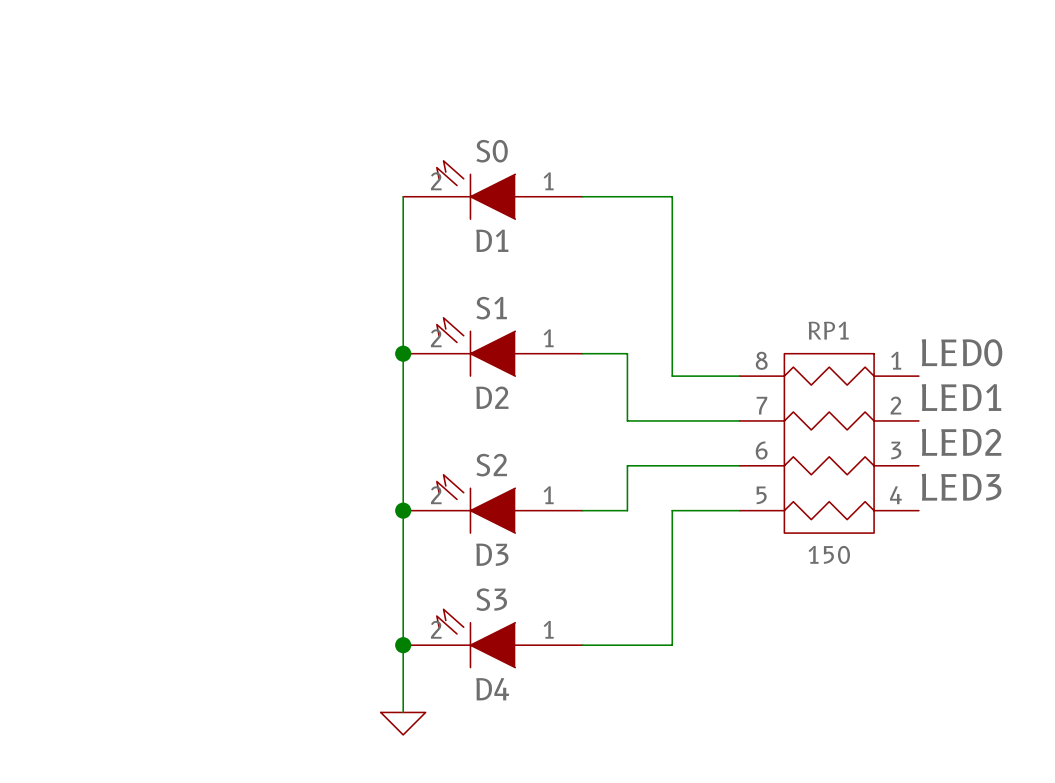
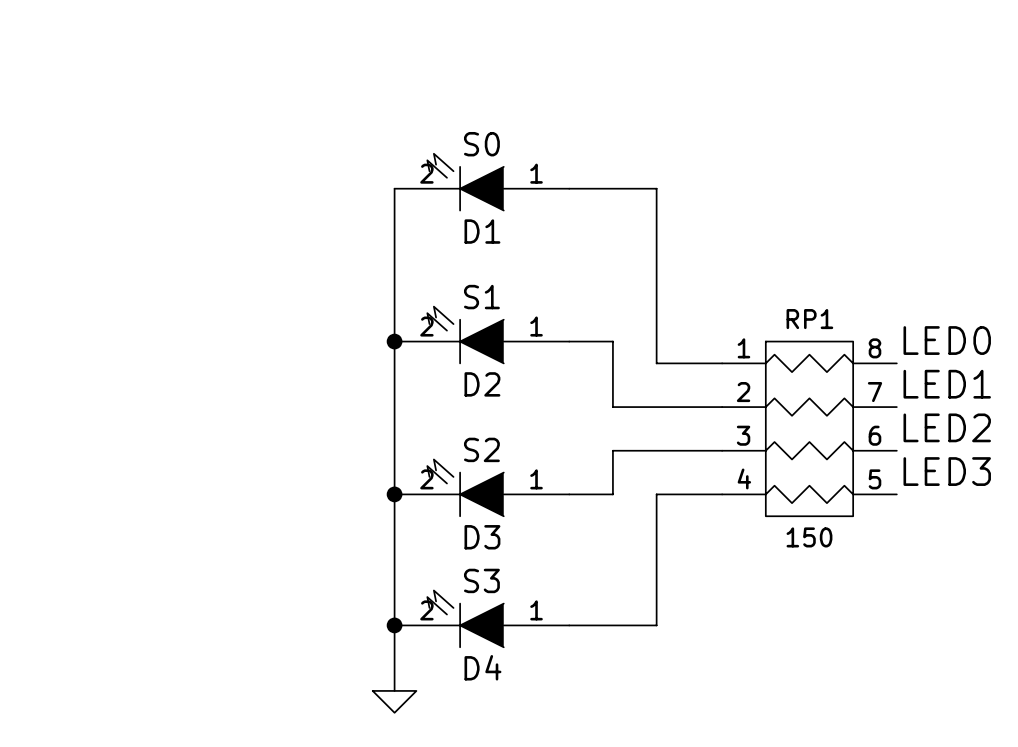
RP1 flip: as is (829, 443) -> left-right (809, 428)

